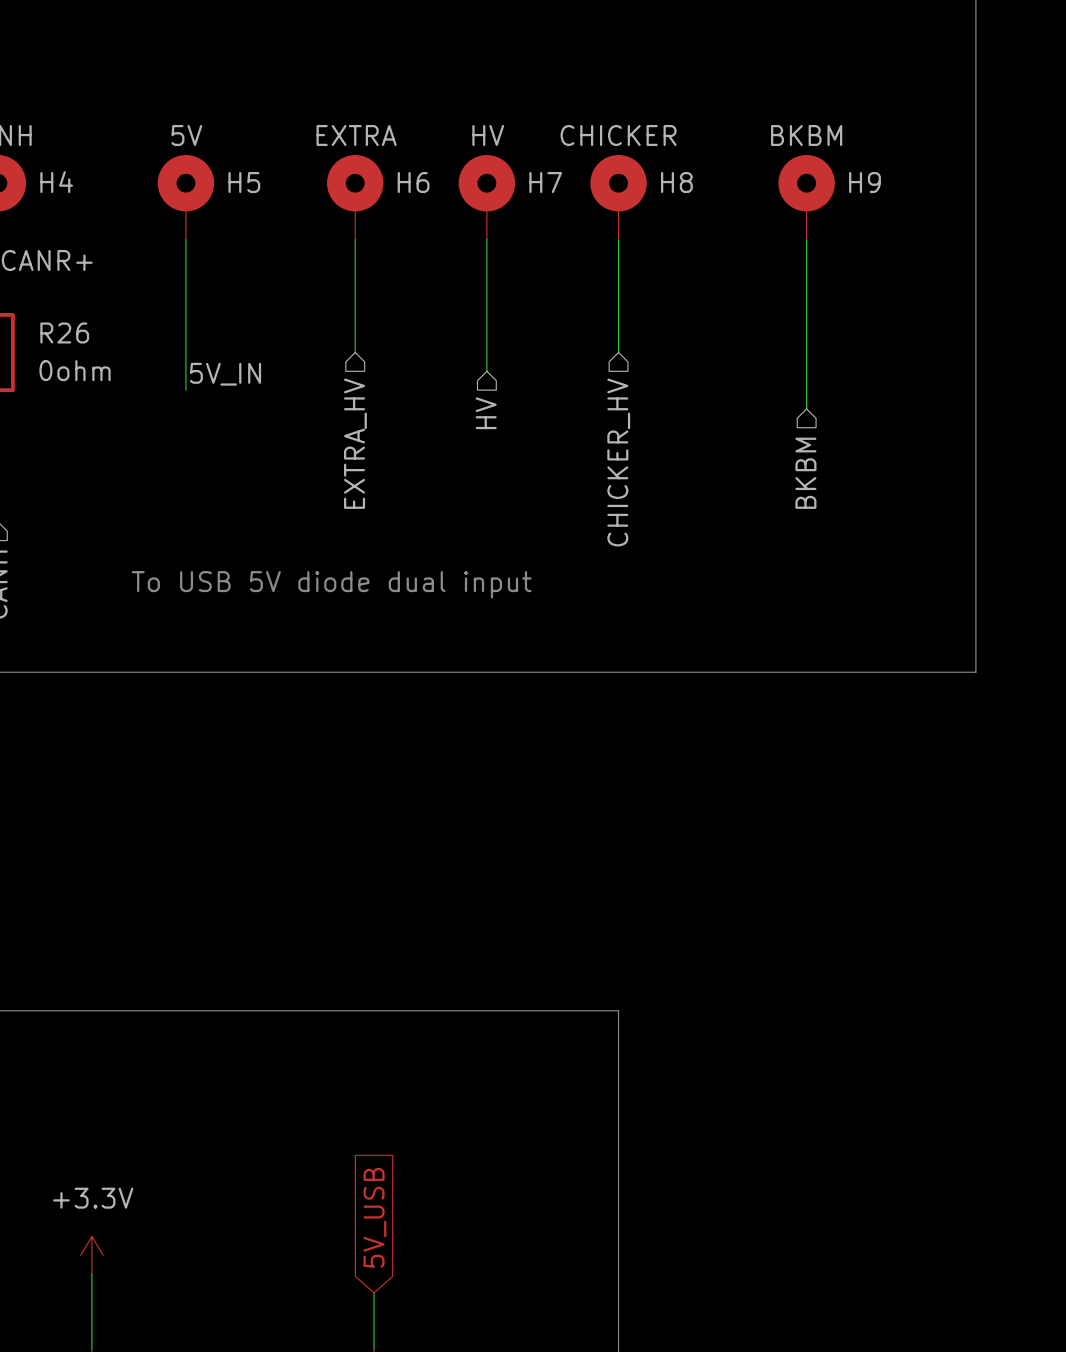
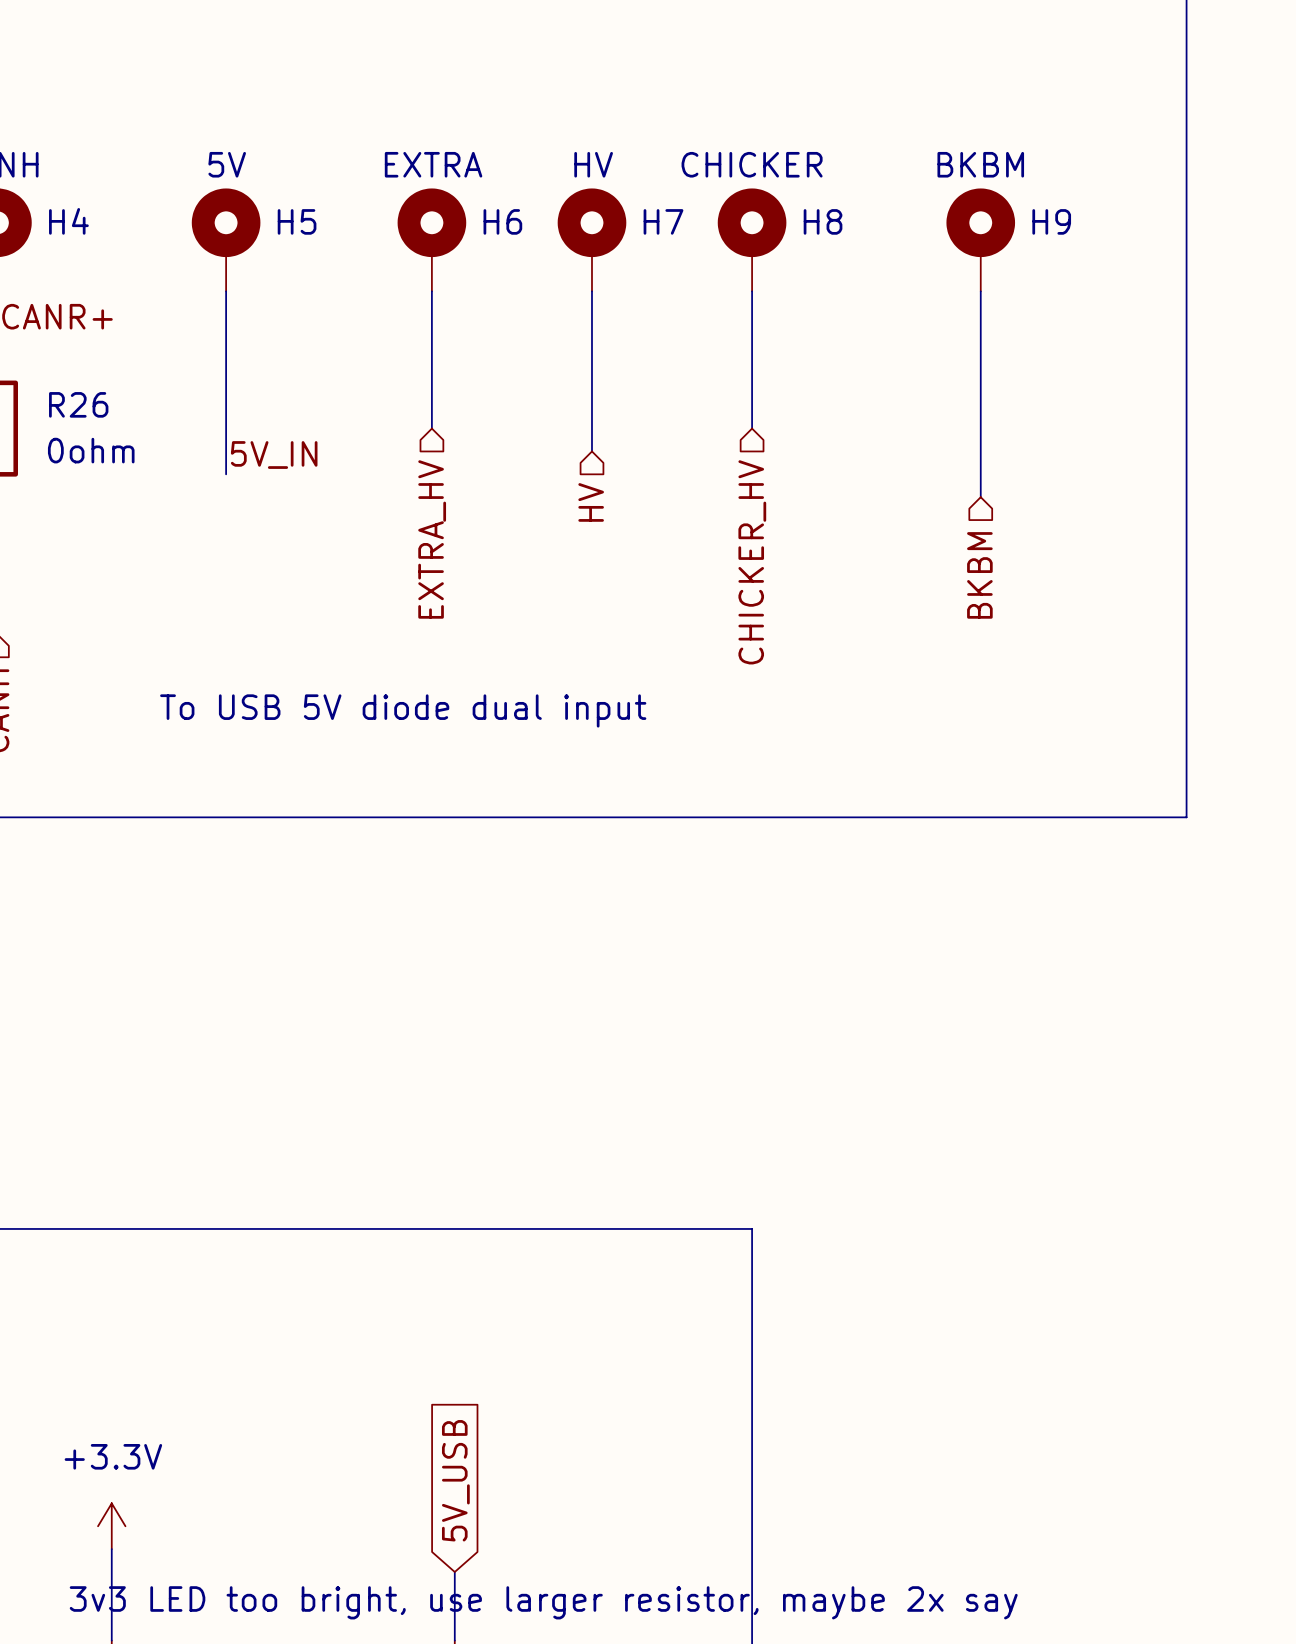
text: none -> 3v3 LED too bright, use larger resistor, maybe 2x say (543, 1602)

